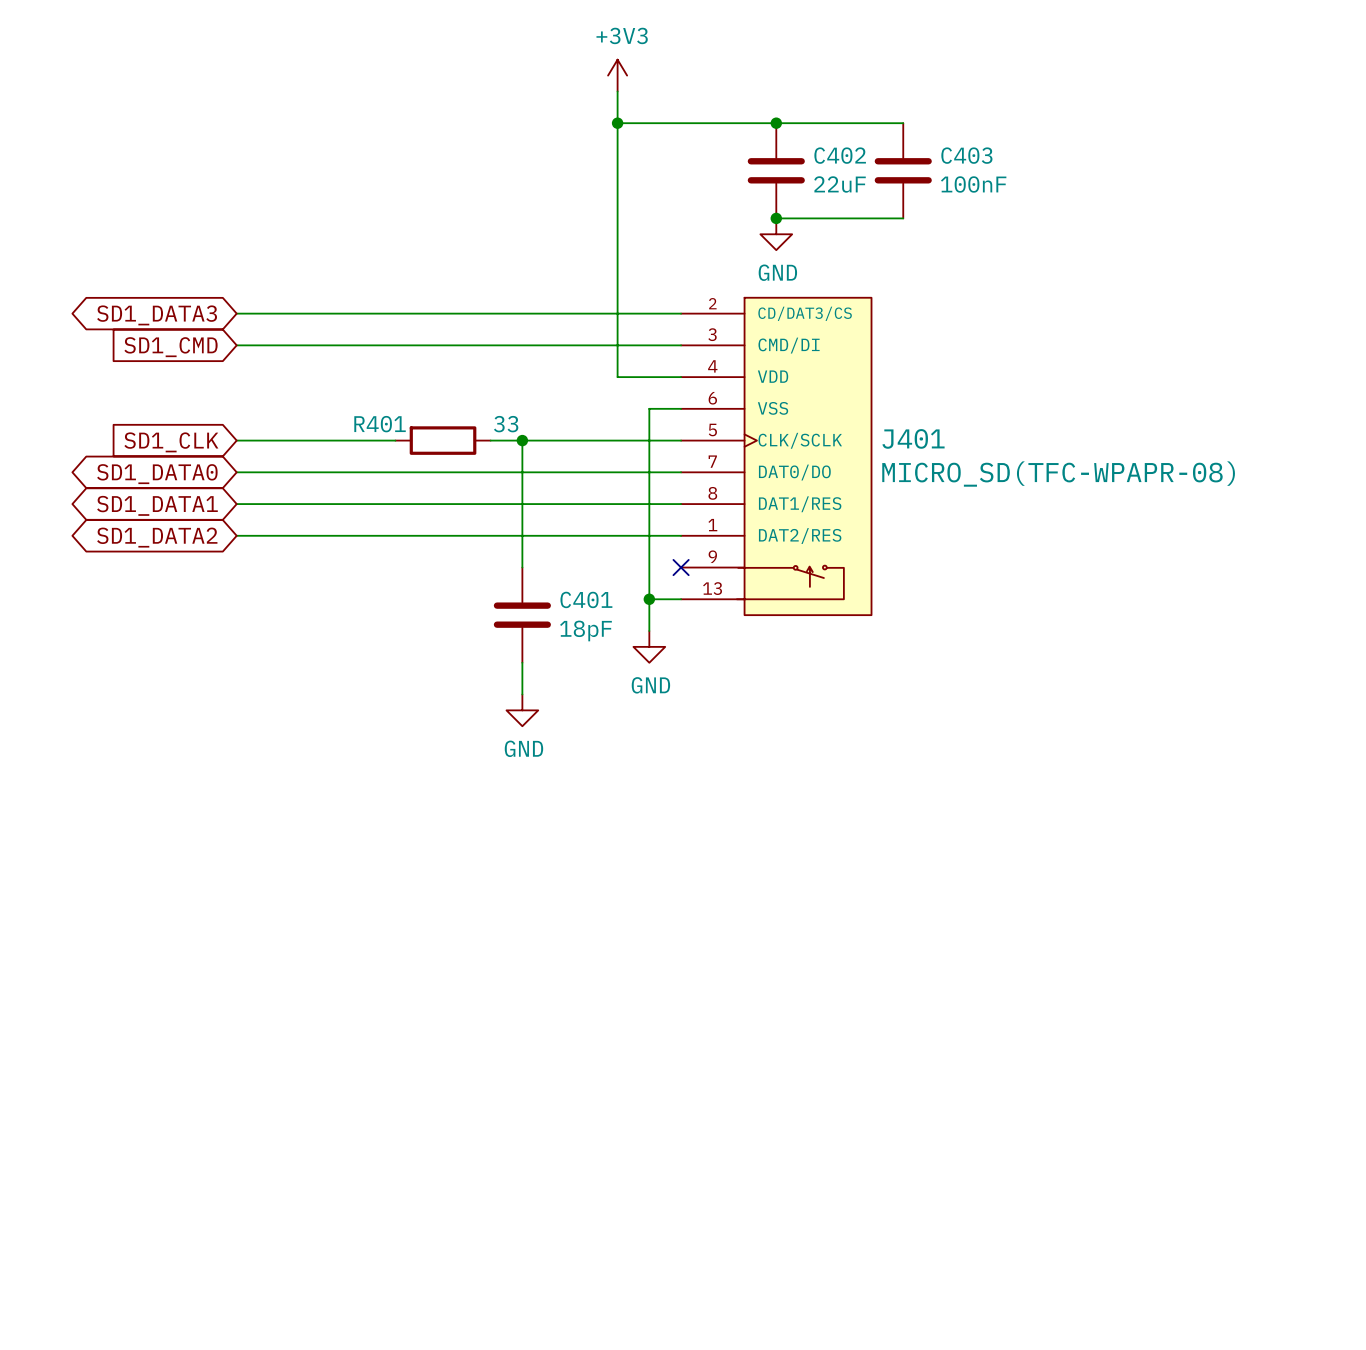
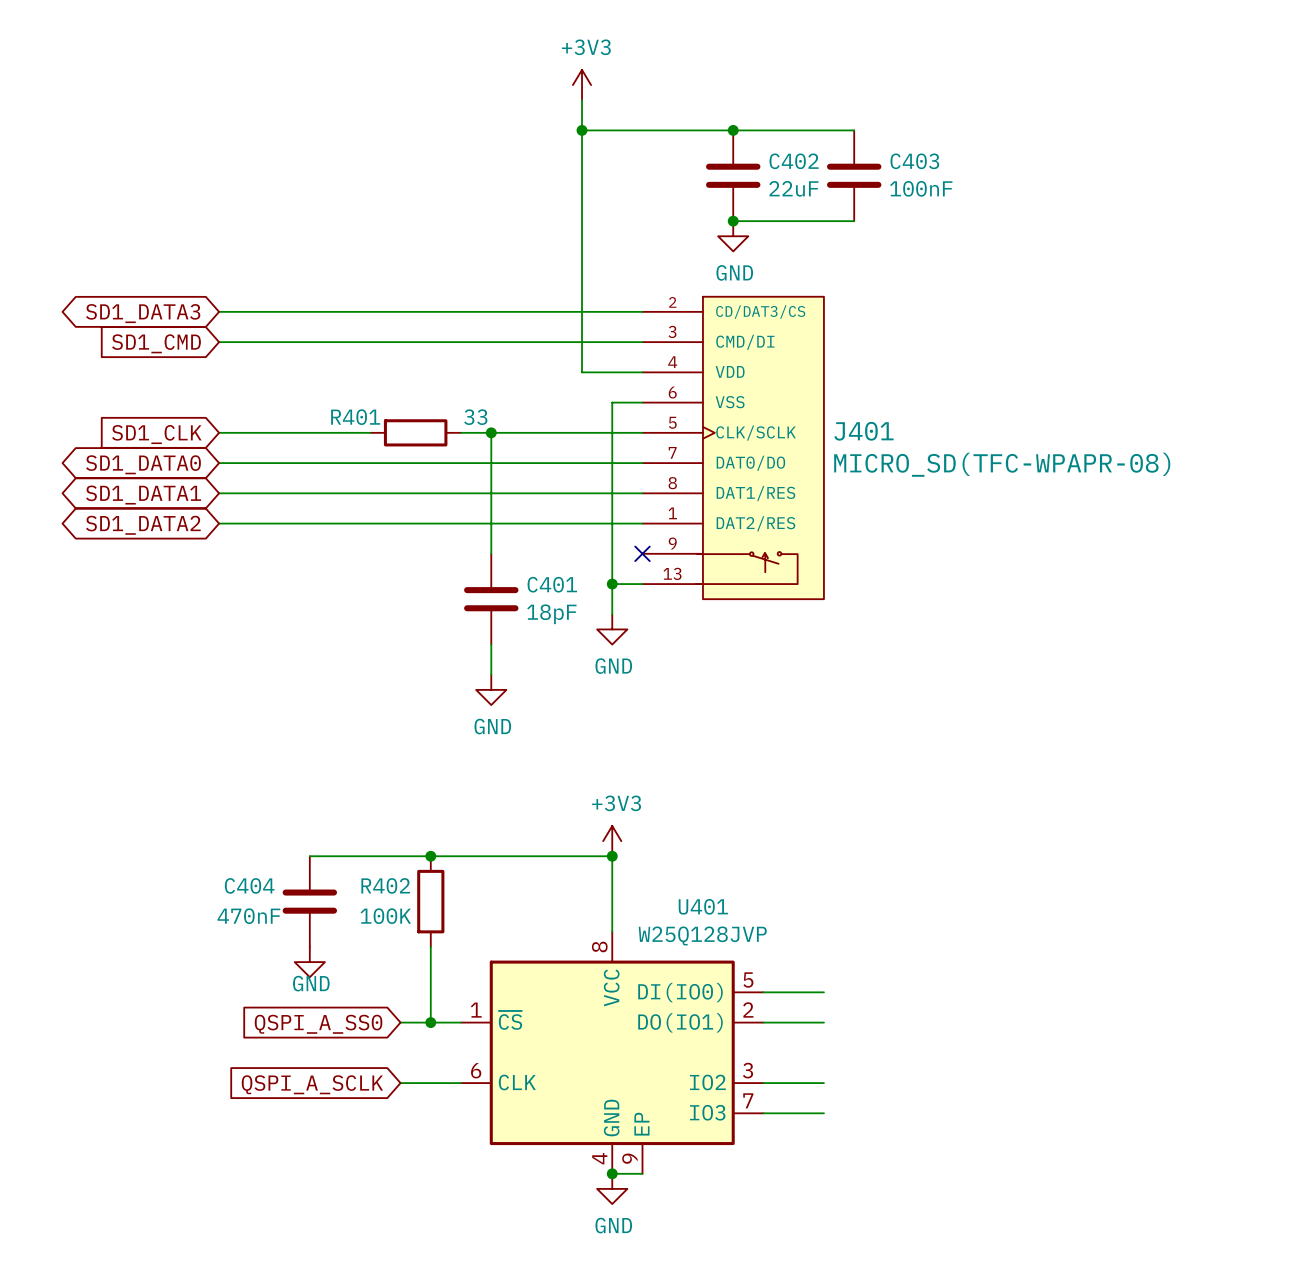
power symbol: none -> +3V3 (612, 841)
wire: none -> (309, 856) (612, 856) (612, 931)
junction: none -> (430, 856)
junction: none -> (612, 856)
C404: none -> 470nF (309, 901)
R402: none -> 100K (430, 901)
wire: none -> (430, 946) (430, 1022)
power symbol: none -> GND (309, 962)
wire: none -> (763, 992) (823, 992)
wire: none -> (400, 1022) (461, 1022)
junction: none -> (430, 1022)
wire: none -> (763, 1022) (823, 1022)
global label: none -> QSPI_A_SS0 (318, 1024)
U401: none -> W25Q128JVP (612, 1052)
wire: none -> (400, 1083) (461, 1083)
wire: none -> (763, 1083) (823, 1083)
global label: none -> QSPI_A_SCLK (312, 1084)
wire: none -> (763, 1113) (823, 1113)
wire: none -> (612, 1173) (642, 1173)
junction: none -> (612, 1173)
power symbol: none -> GND (612, 1188)

